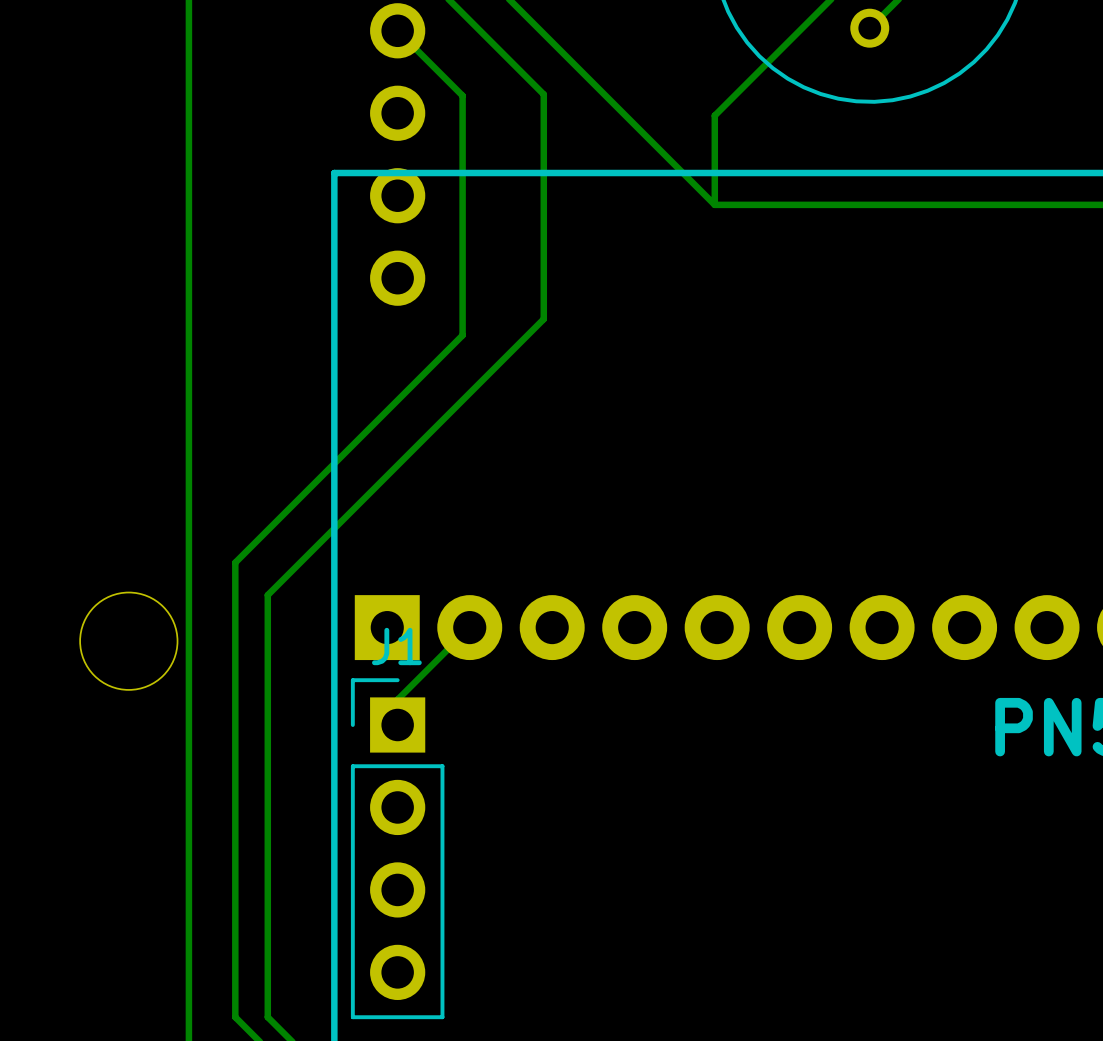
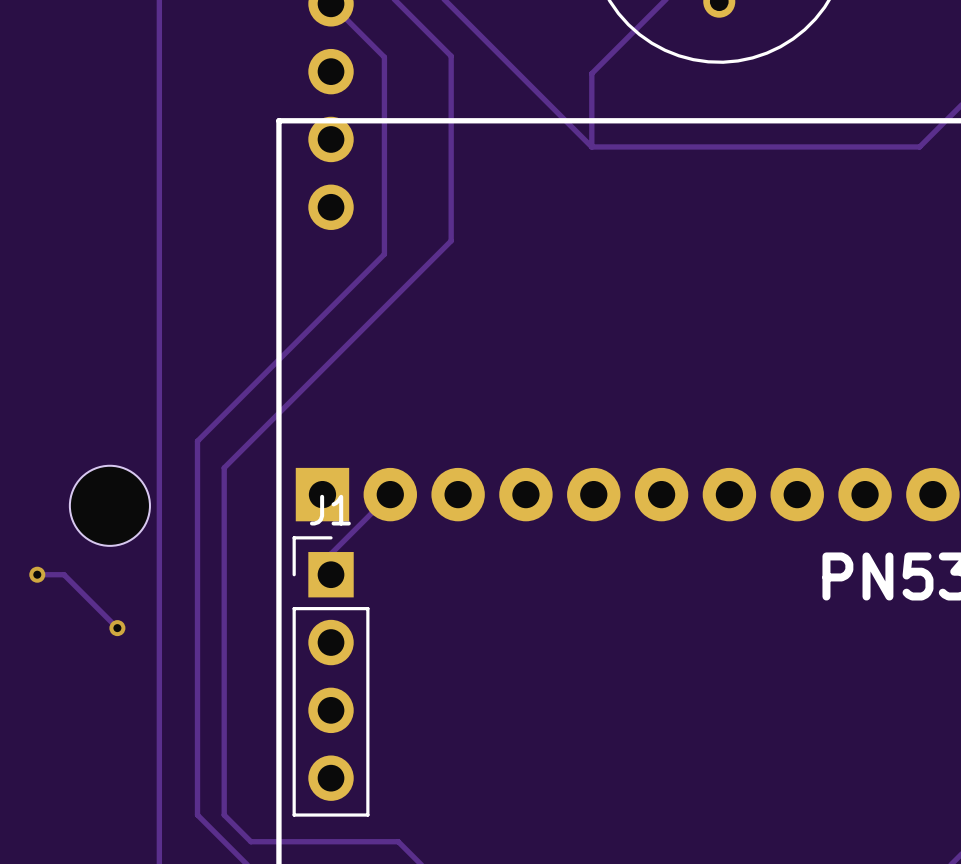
track: none -> (37, 574) (63, 574) (117, 628)
via: none -> (37, 574)
via: none -> (117, 628)

